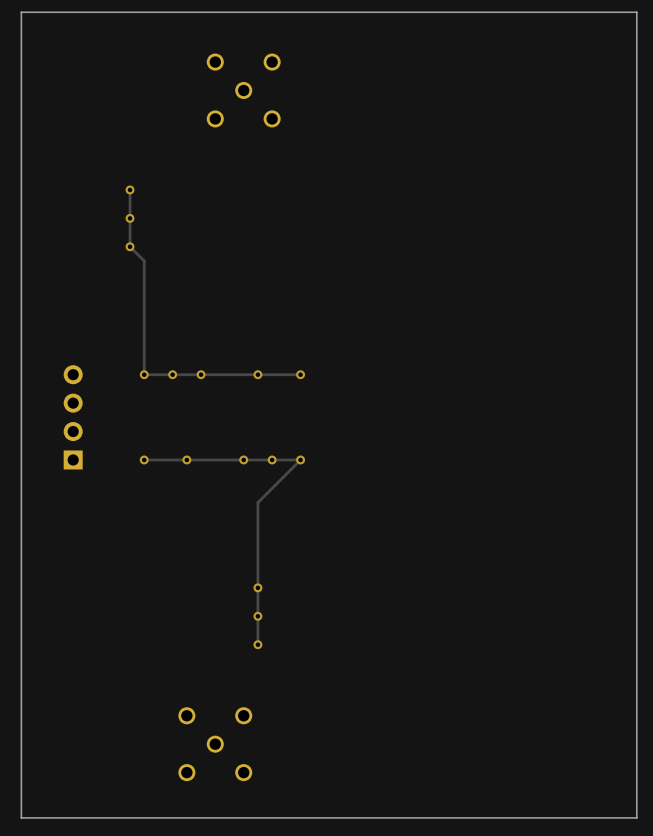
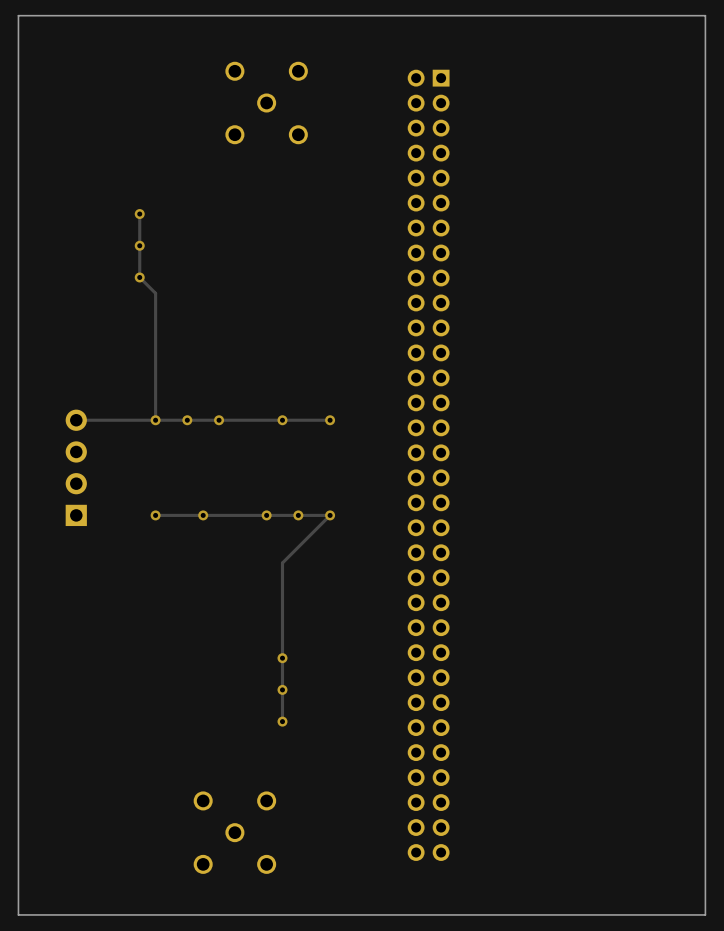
track: none -> (155, 420) (76, 420)
part: none -> (428, 465)

